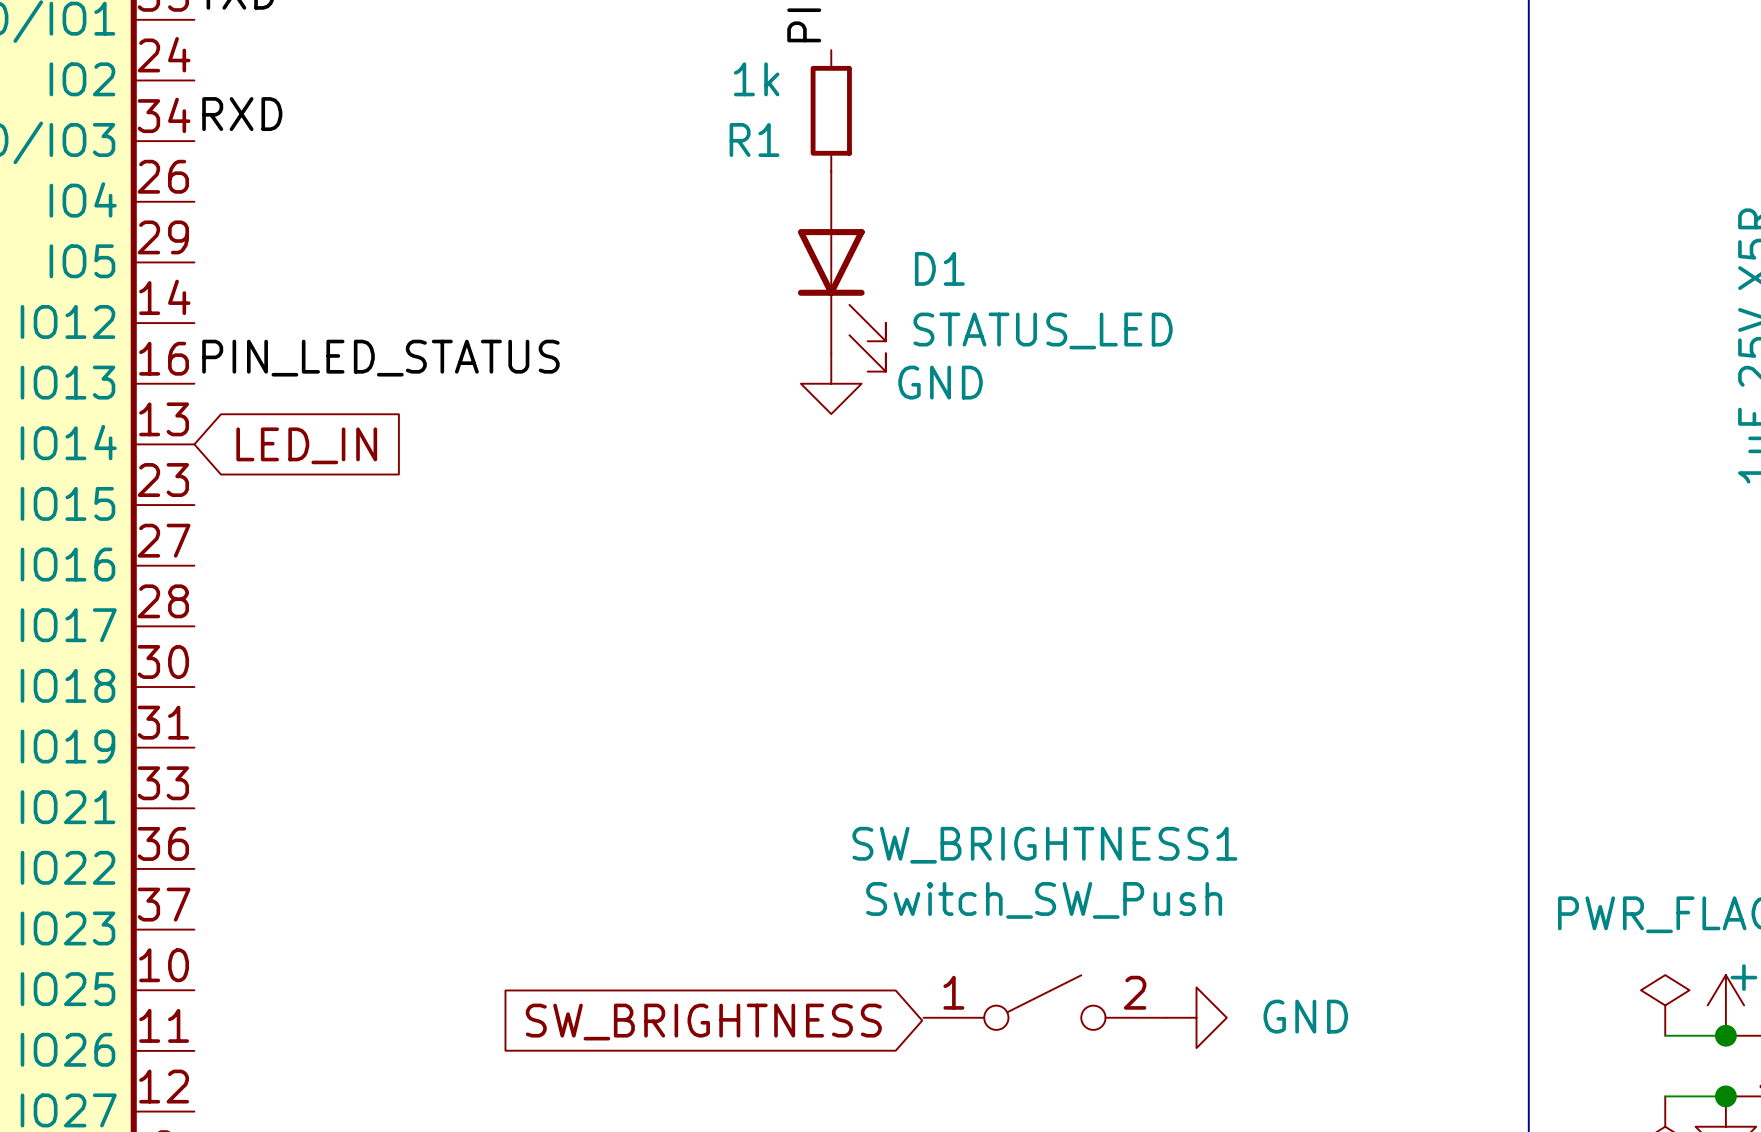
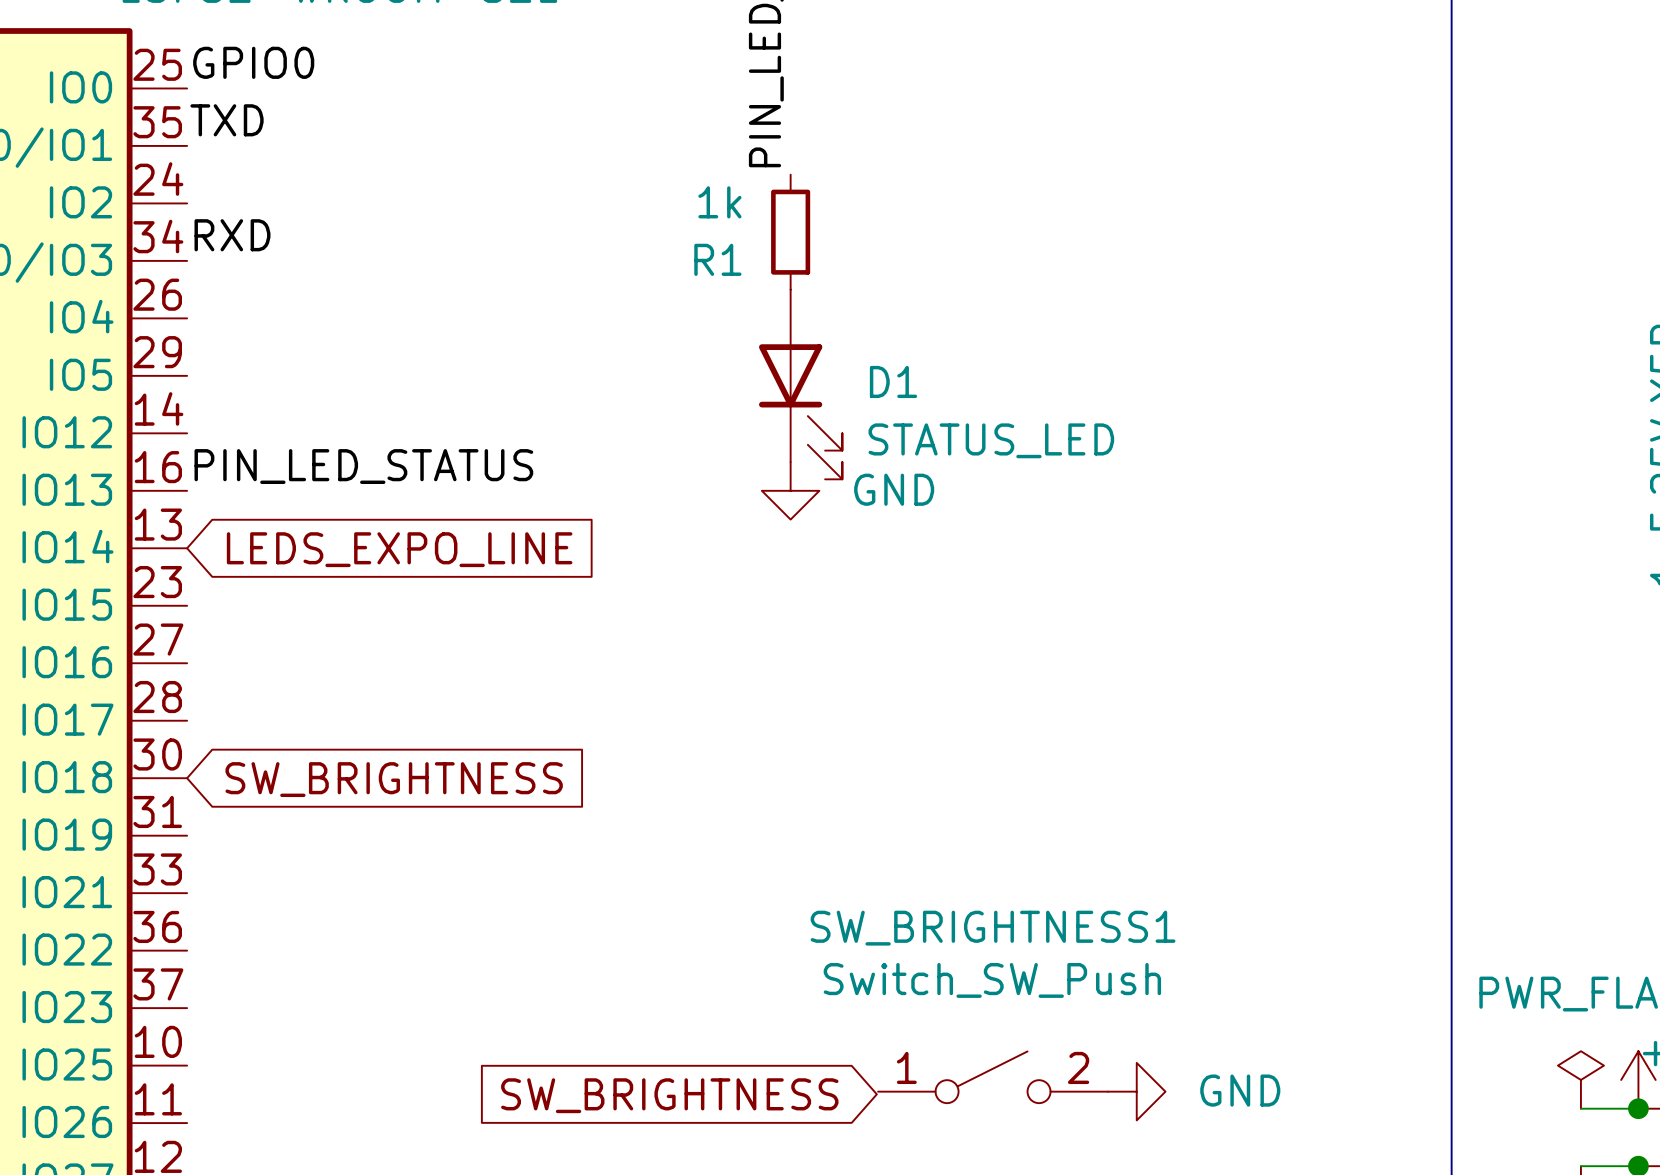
global label: LED_IN (306, 445) -> LEDS_EXPO_LINE (399, 549)
global label: none -> SW_BRIGHTNESS (394, 779)

